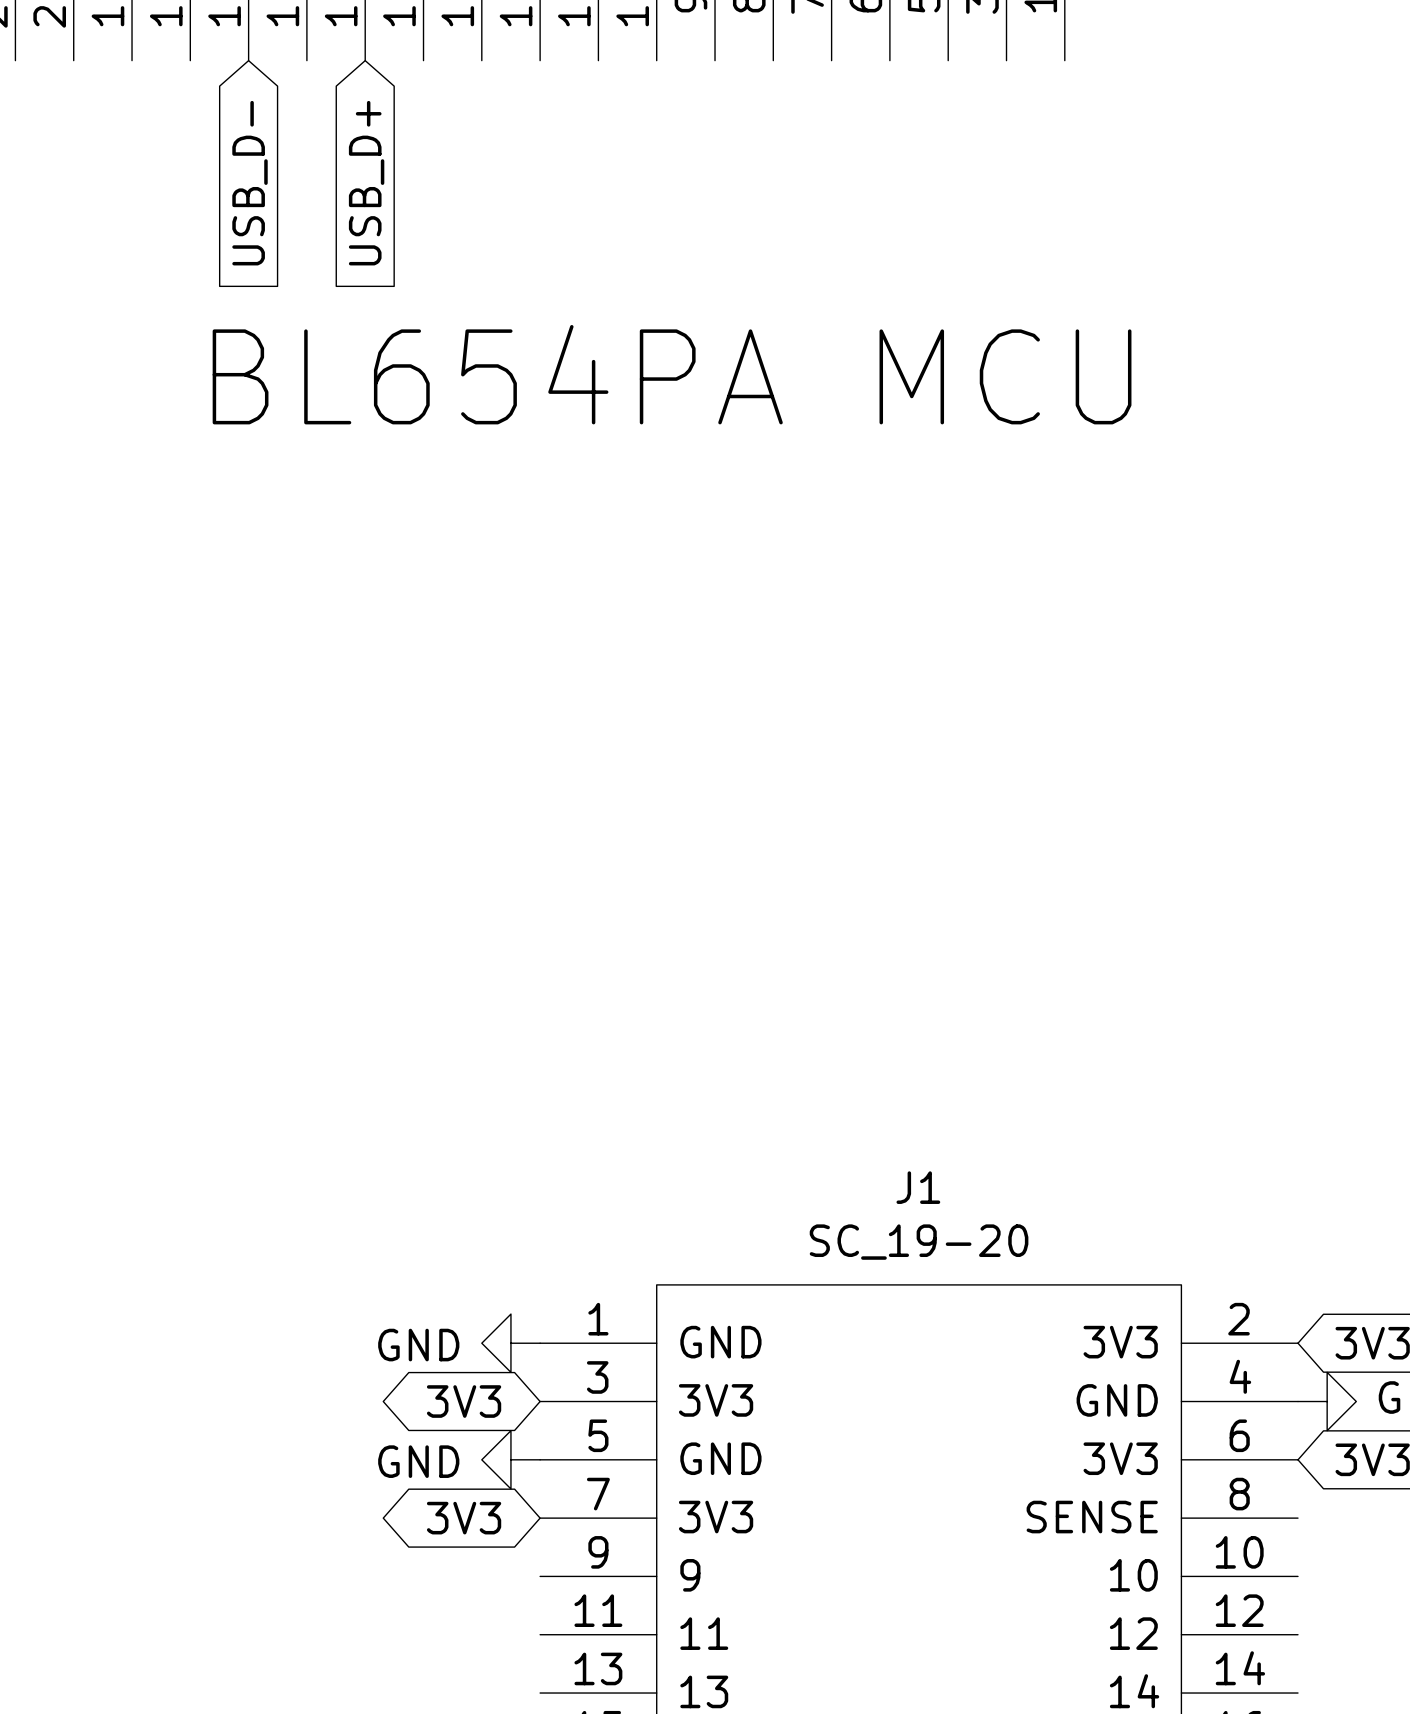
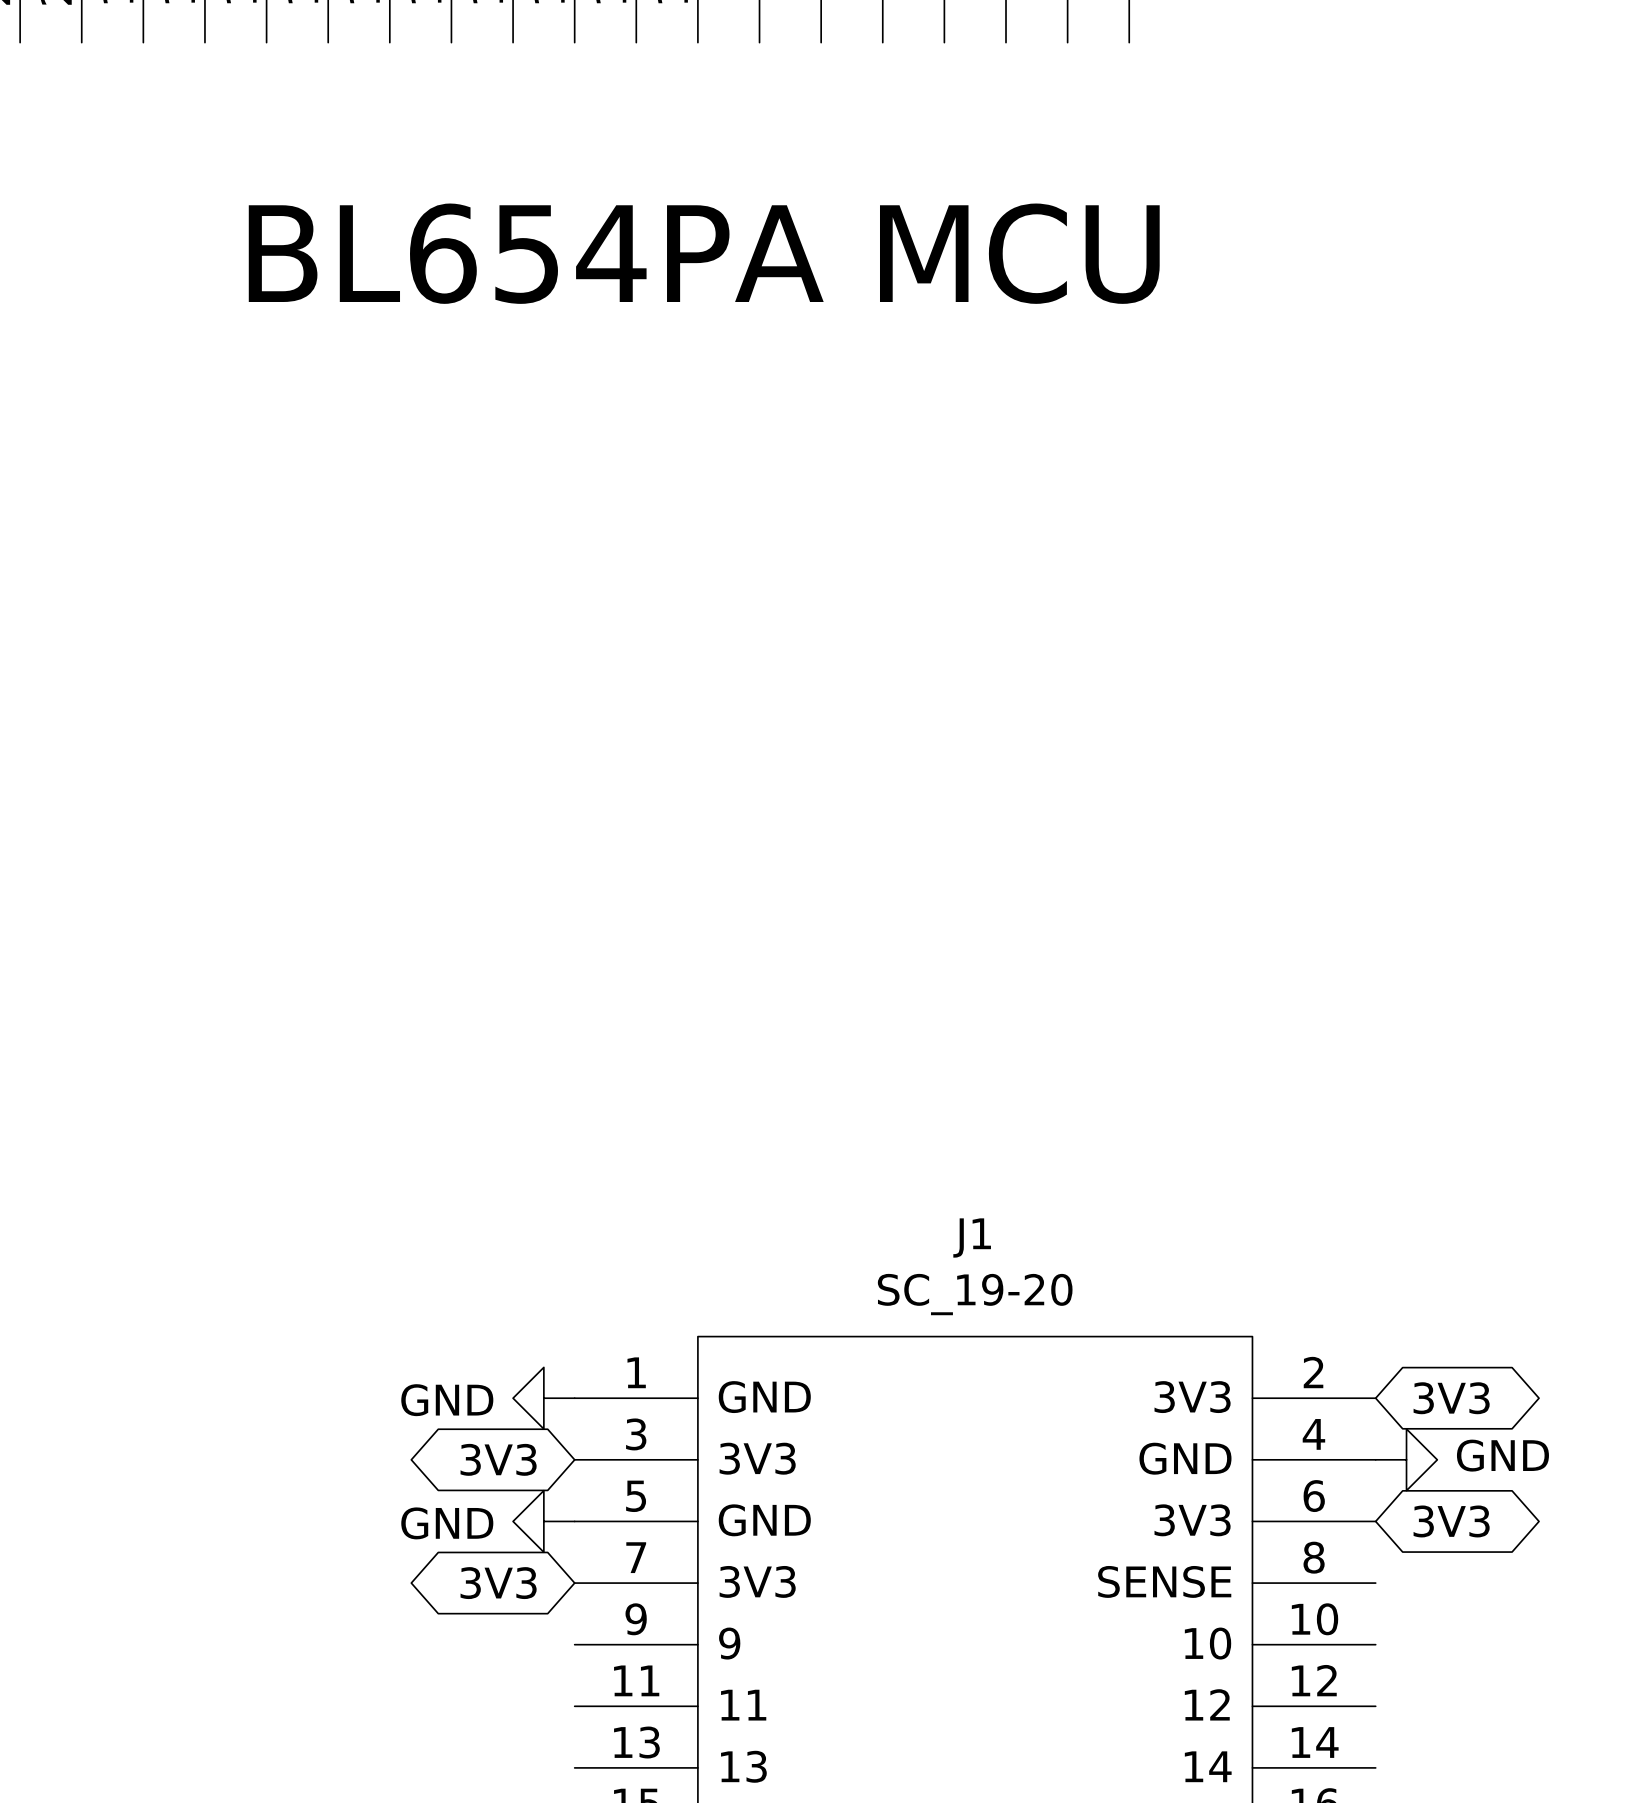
global label: USB_D- (250, 183) -> none
global label: USB_D+ (366, 183) -> none
text position: BL654PA MCU (672, 374) -> BL654PA MCU (704, 253)

